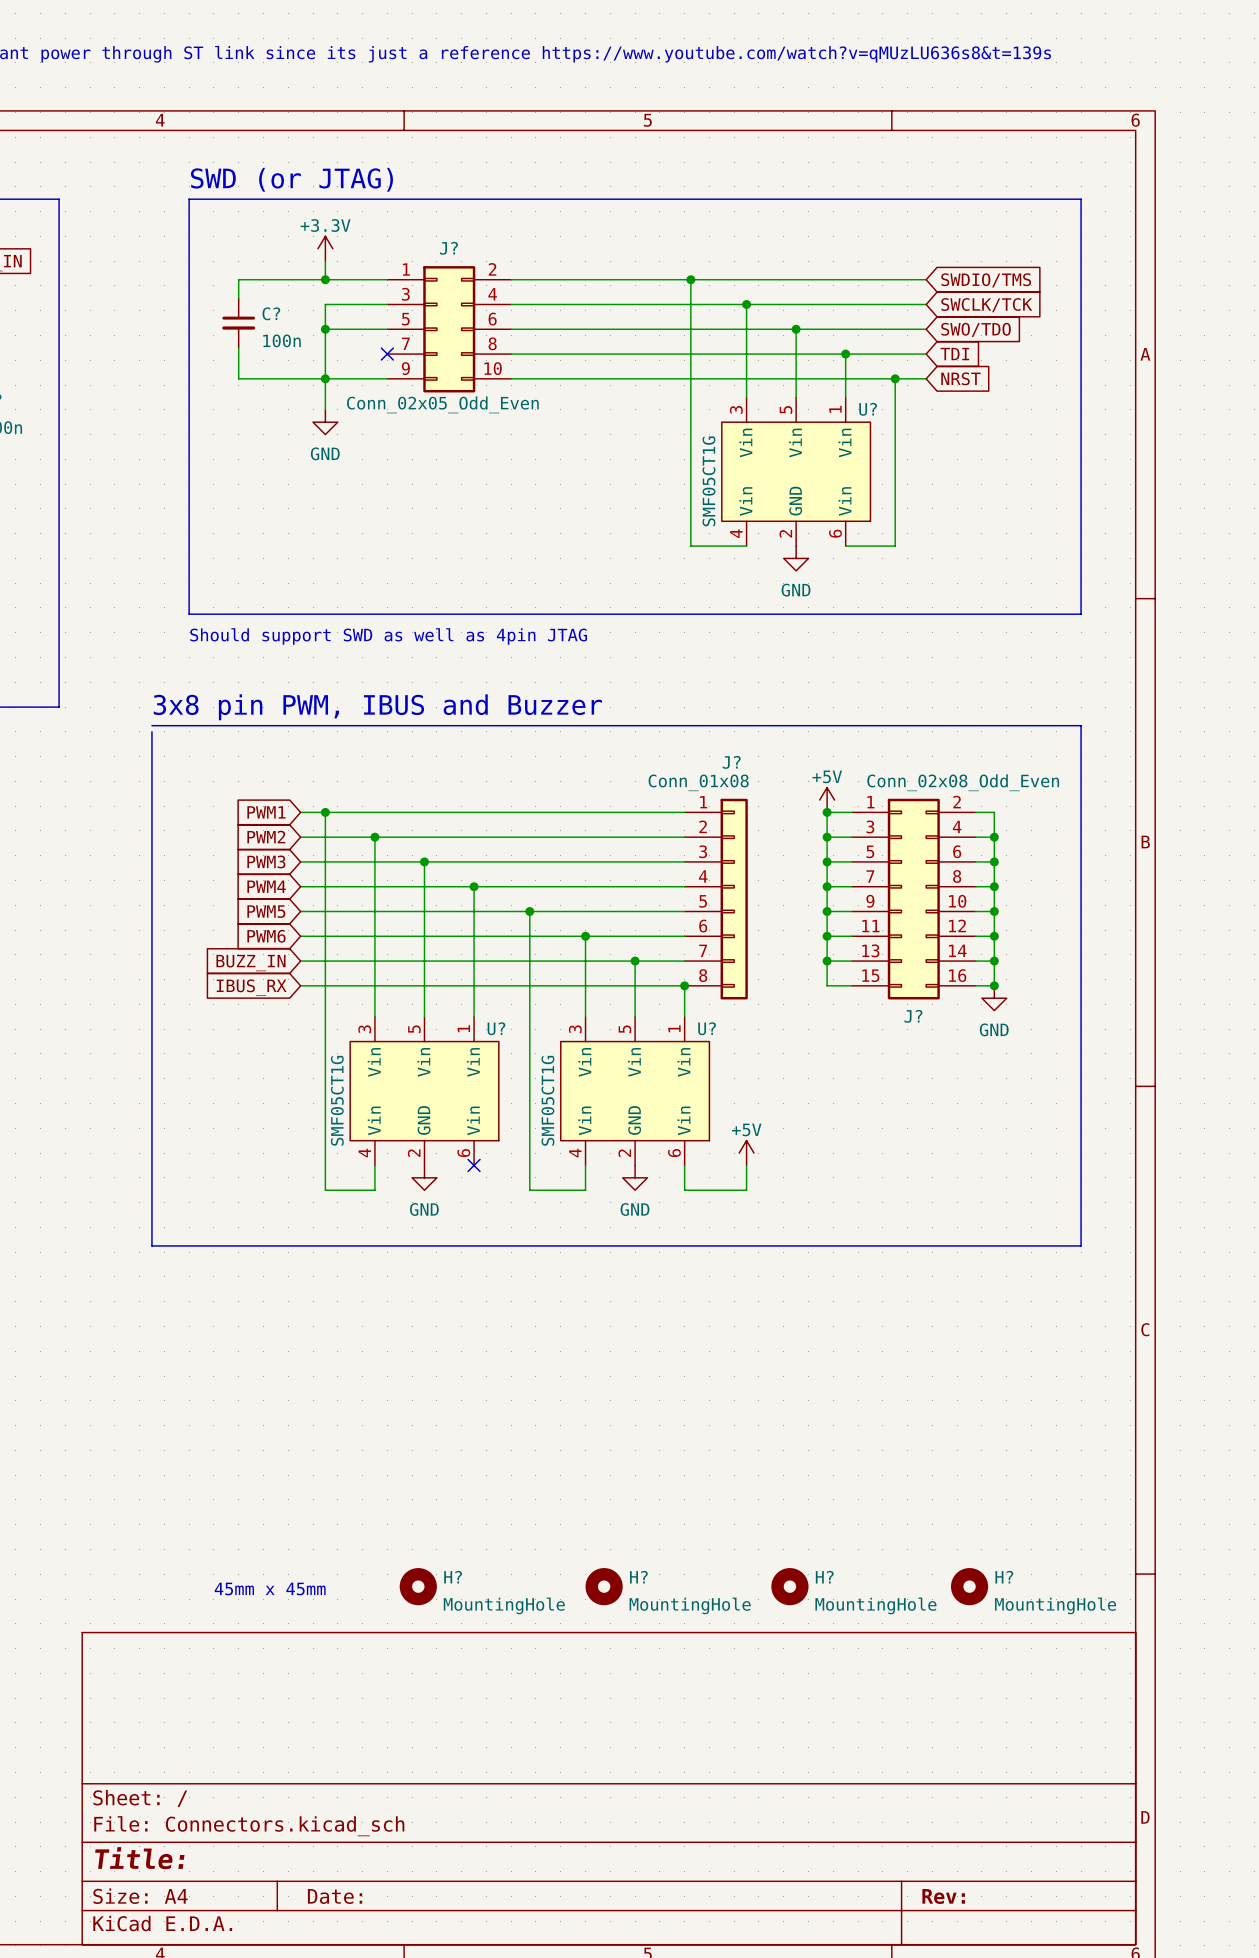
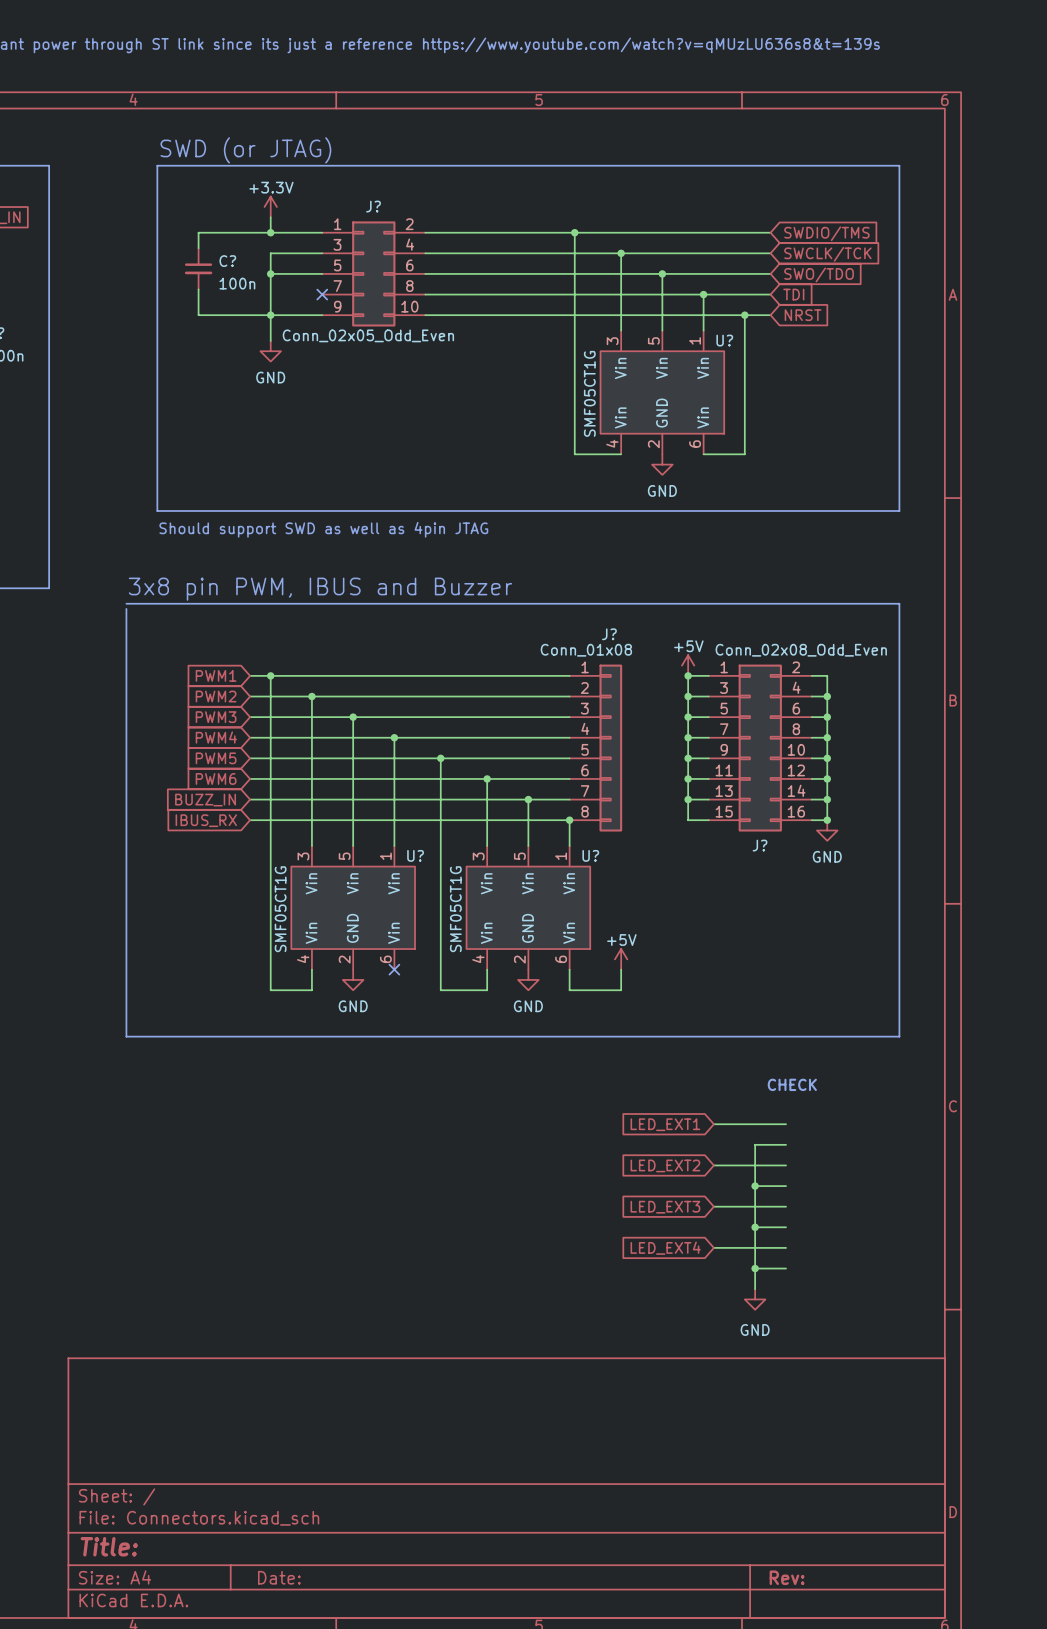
text: none -> CHECK (792, 1084)
wire: none -> (713, 1124) (786, 1124)
global label: none -> LED_EXT1 (665, 1124)
wire: none -> (786, 1144) (755, 1144) (755, 1289)
wire: none -> (713, 1165) (786, 1165)
global label: none -> LED_EXT2 (665, 1165)
wire: none -> (755, 1186) (786, 1186)
junction: none -> (755, 1186)
wire: none -> (713, 1206) (786, 1206)
global label: none -> LED_EXT3 (665, 1207)
wire: none -> (755, 1227) (786, 1227)
junction: none -> (755, 1227)
wire: none -> (713, 1247) (786, 1247)
global label: none -> LED_EXT4 (665, 1248)
wire: none -> (755, 1268) (786, 1268)
junction: none -> (755, 1268)
power symbol: none -> GND (755, 1299)
H?: MountingHole (418, 1586) -> none
H?: MountingHole (604, 1586) -> none
H?: MountingHole (789, 1586) -> none
H?: MountingHole (969, 1586) -> none
text: 45mm x 45mm (270, 1588) -> none

